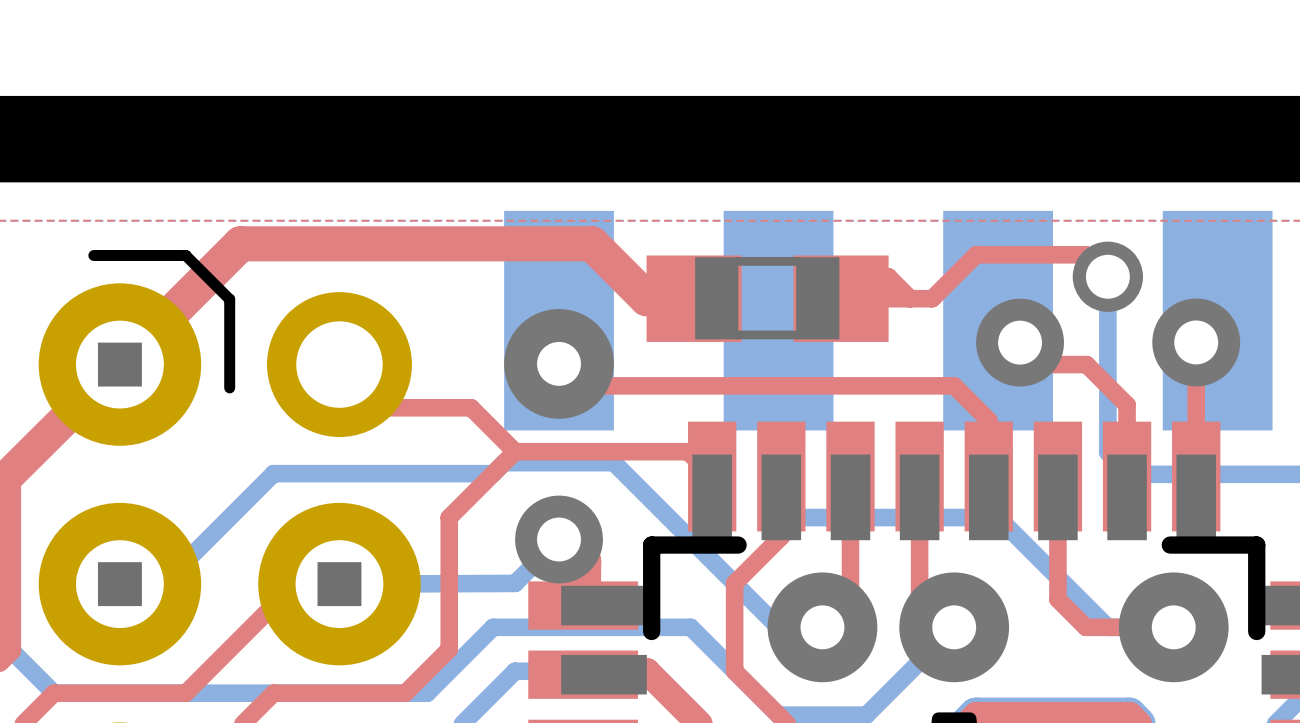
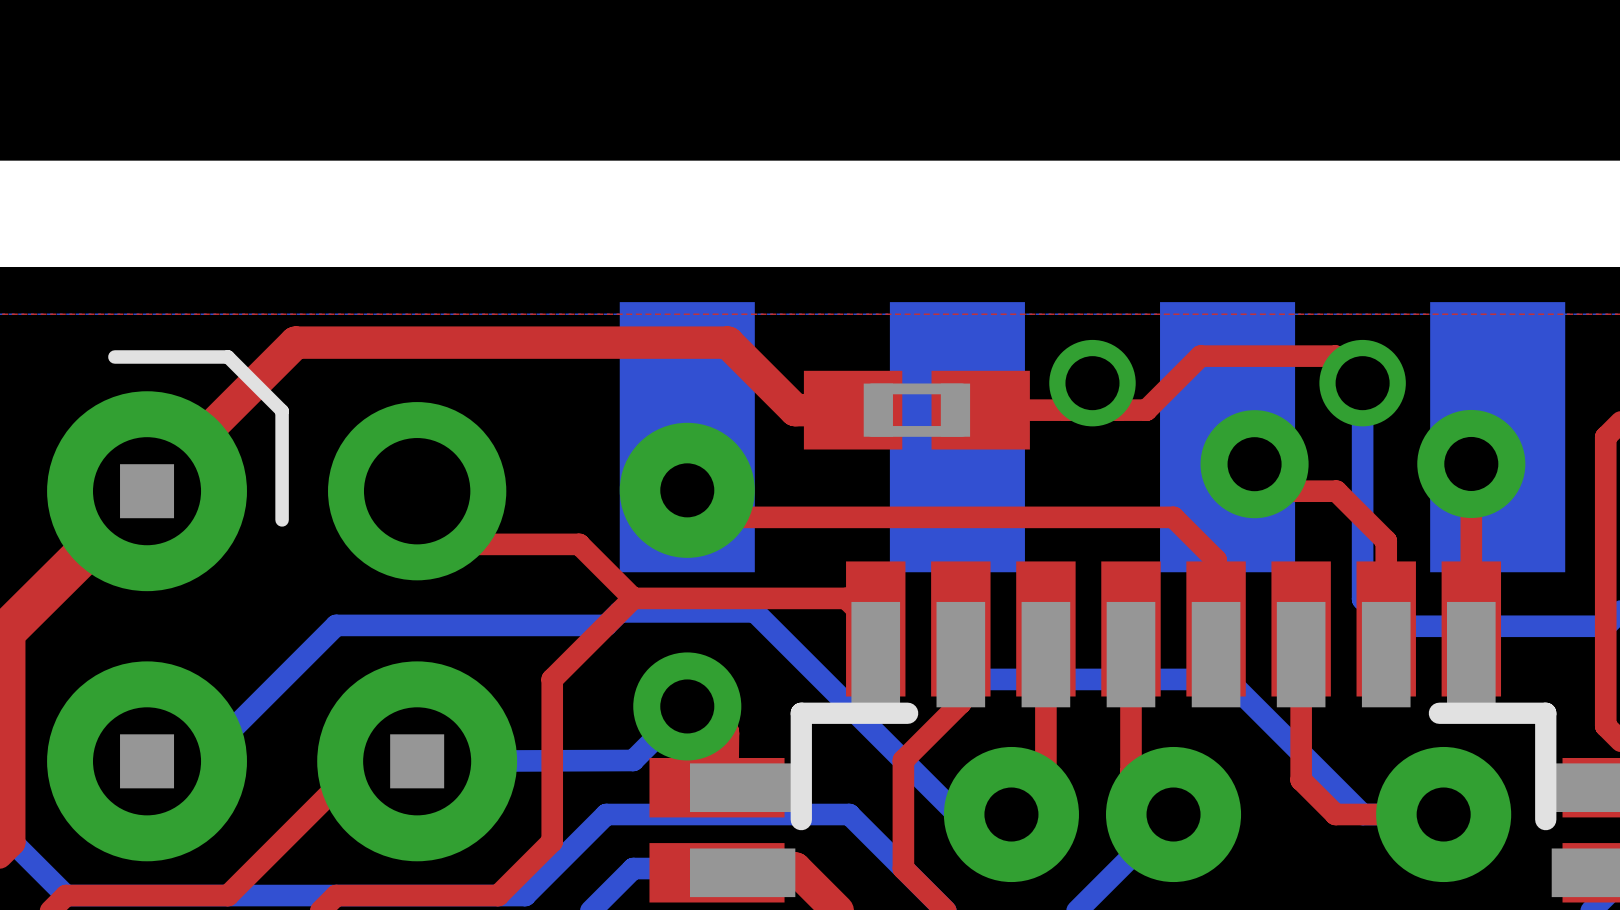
part footprint: [646, 255, 889, 342] -> [803, 370, 1030, 450]
via: none -> (1092, 383)
top track width: thick (694, 298) (646, 298) (591, 243) (240, 243) (119, 364) -> thin (853, 410) (795, 410) (727, 342) (295, 342) (147, 491)

